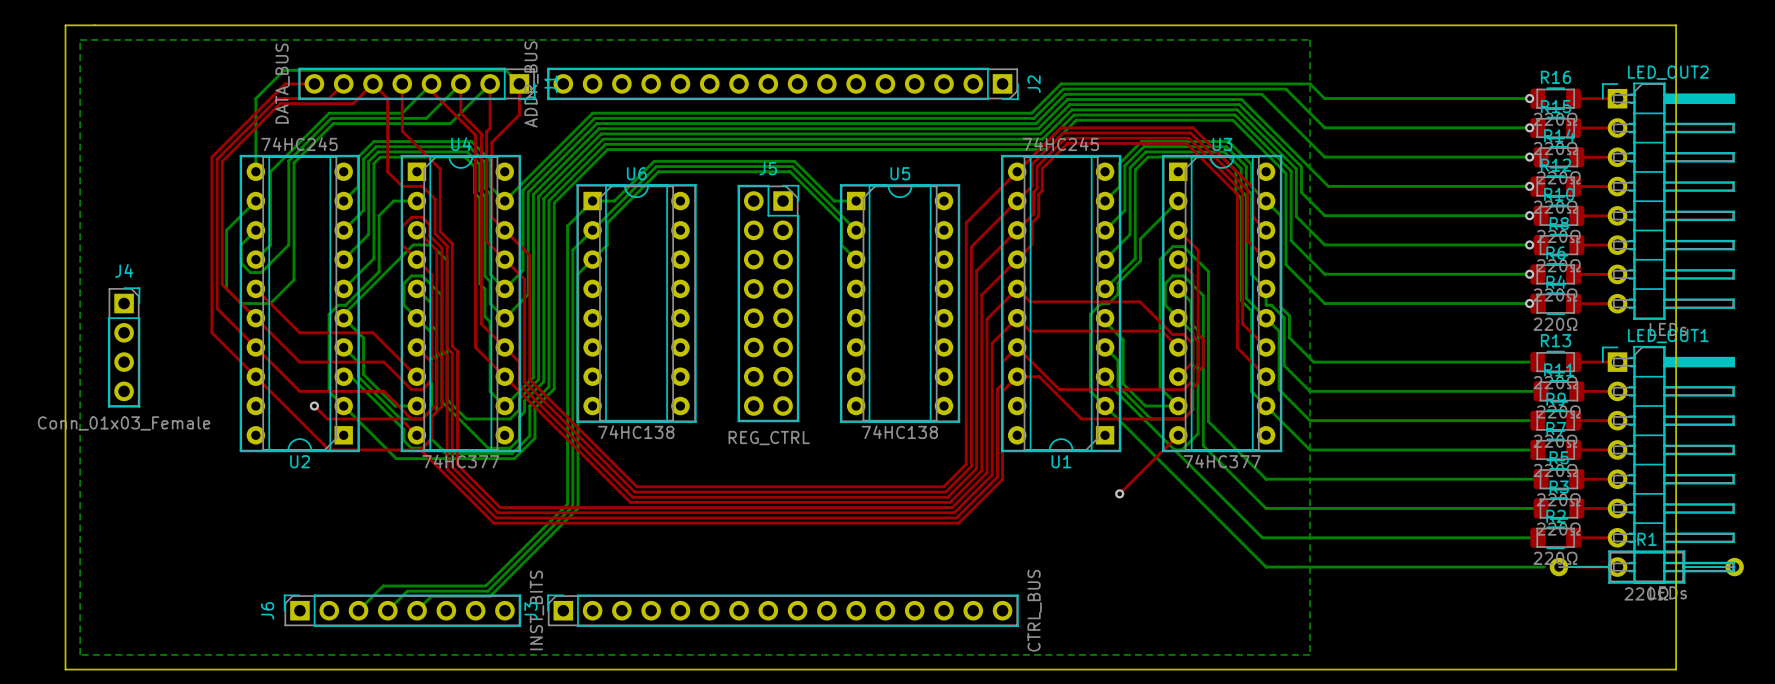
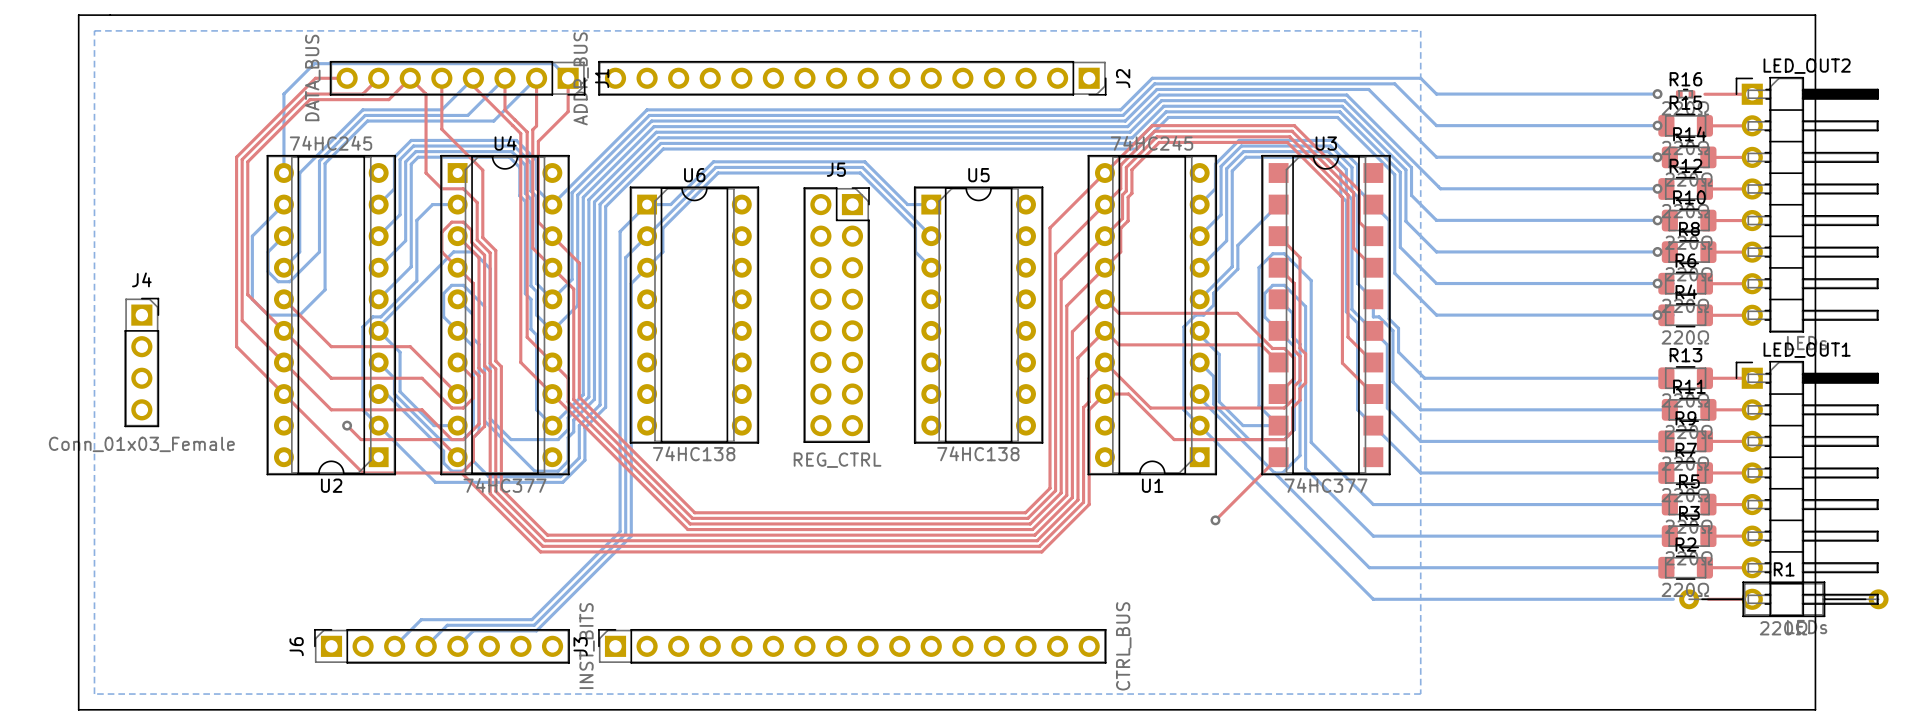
R16 footprint: [1530, 87, 1582, 110] -> [1675, 88, 1696, 100]
U3 footprint: [1162, 155, 1283, 453] -> [1261, 154, 1391, 476]

